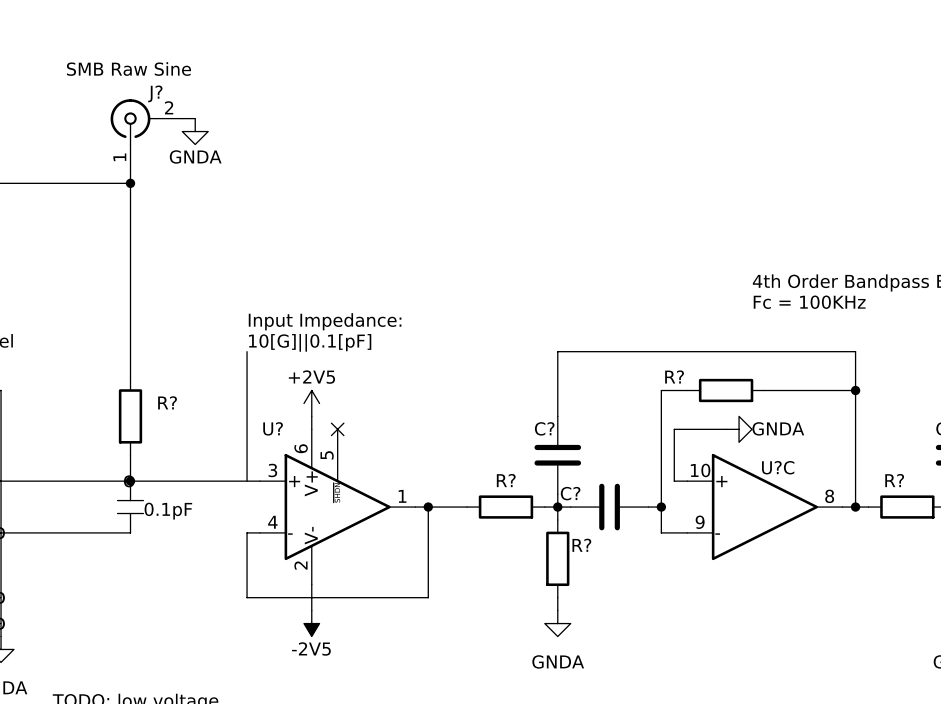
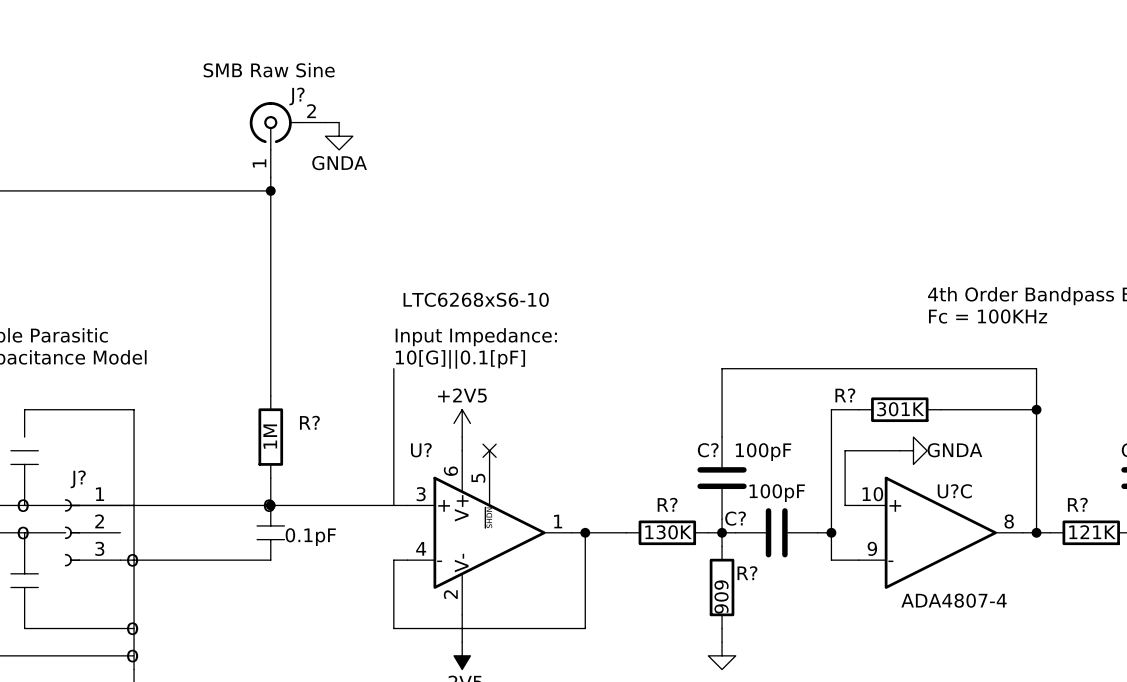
U? value: none -> LTC6268xS6-10 (476, 299)
R? value: none -> 301K (900, 409)
R? value: none -> 1M (270, 436)
C? value: none -> 100pF (763, 452)
C? value: none -> 100pF (777, 493)
R? value: none -> 130K (668, 532)
R? value: none -> 121K (1092, 532)
R? value: none -> 909 (721, 597)
U?C value: none -> ADA4807-4 (954, 600)

